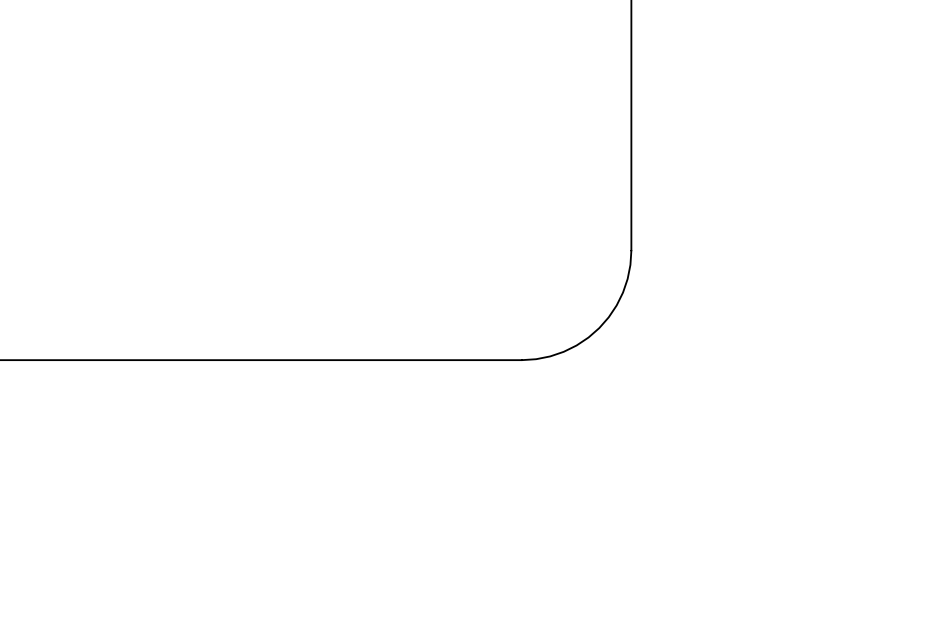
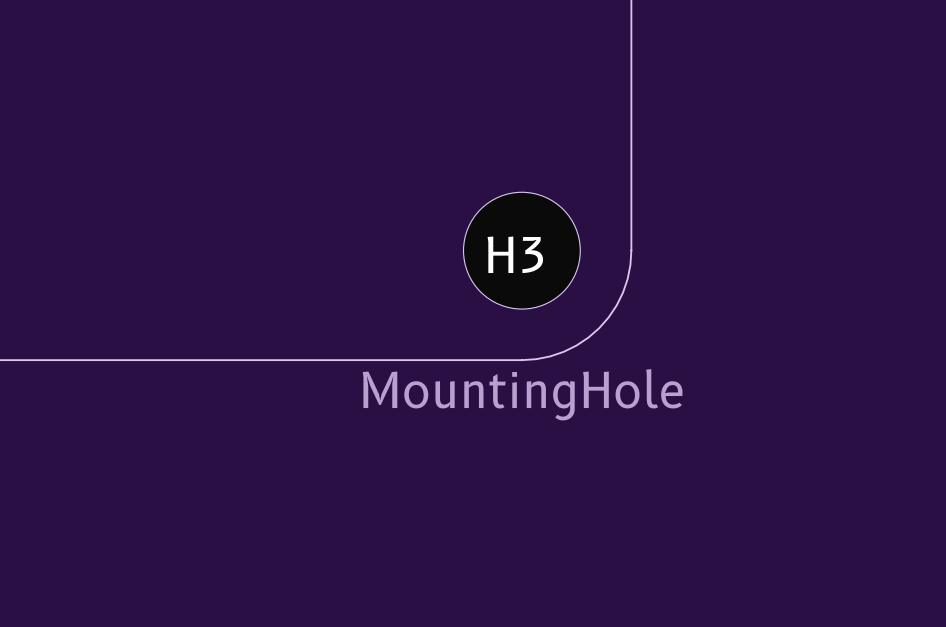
H3: none -> MountingHole (521, 250)

